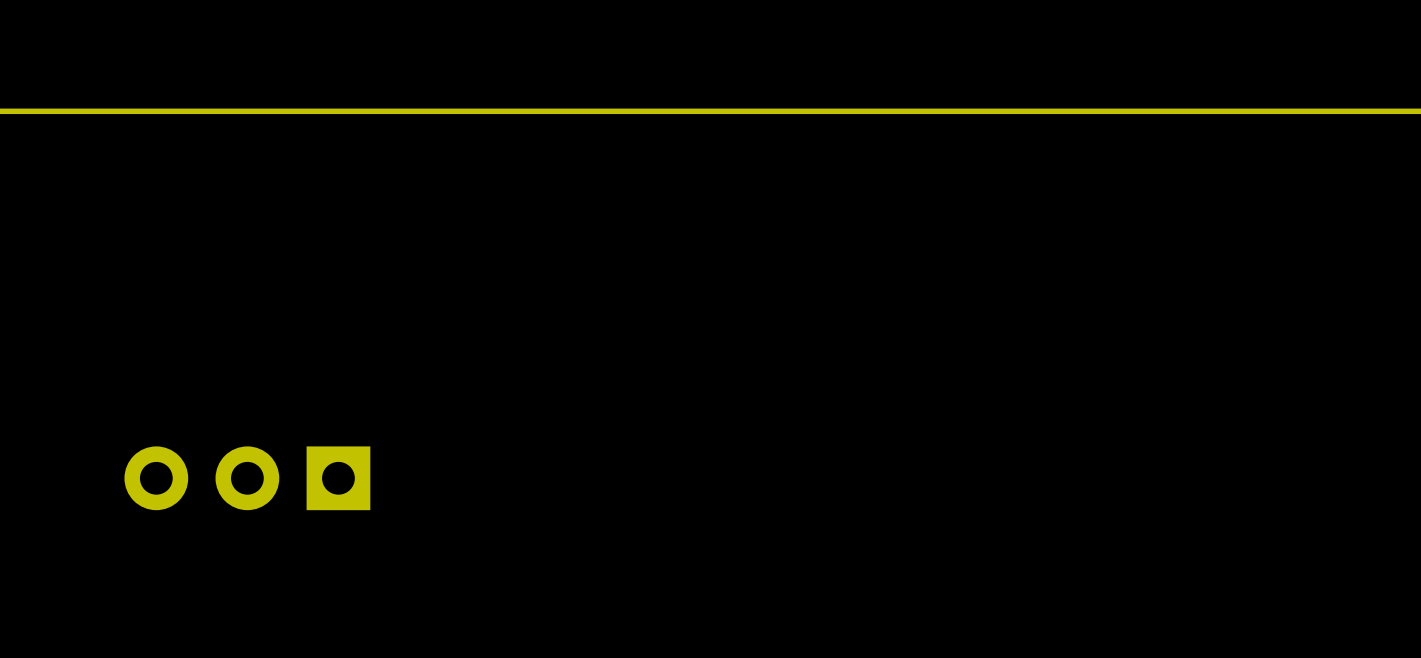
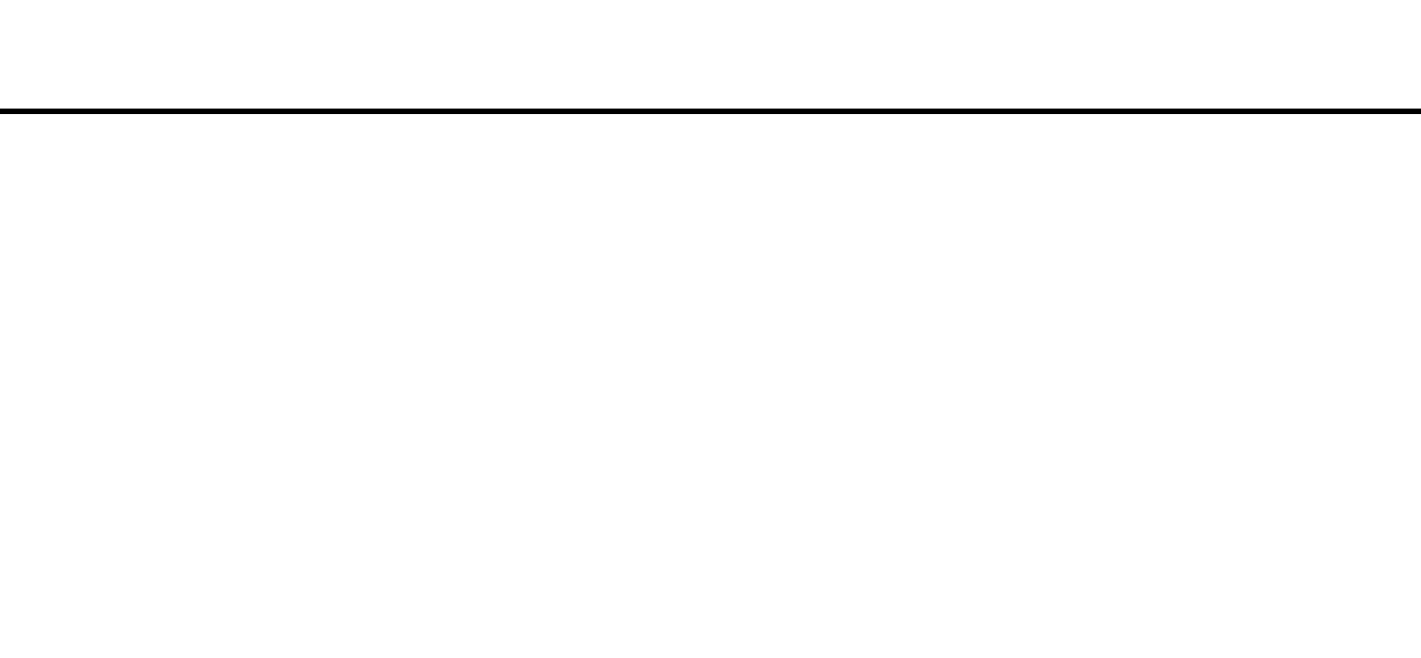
part: (247, 478) -> none

